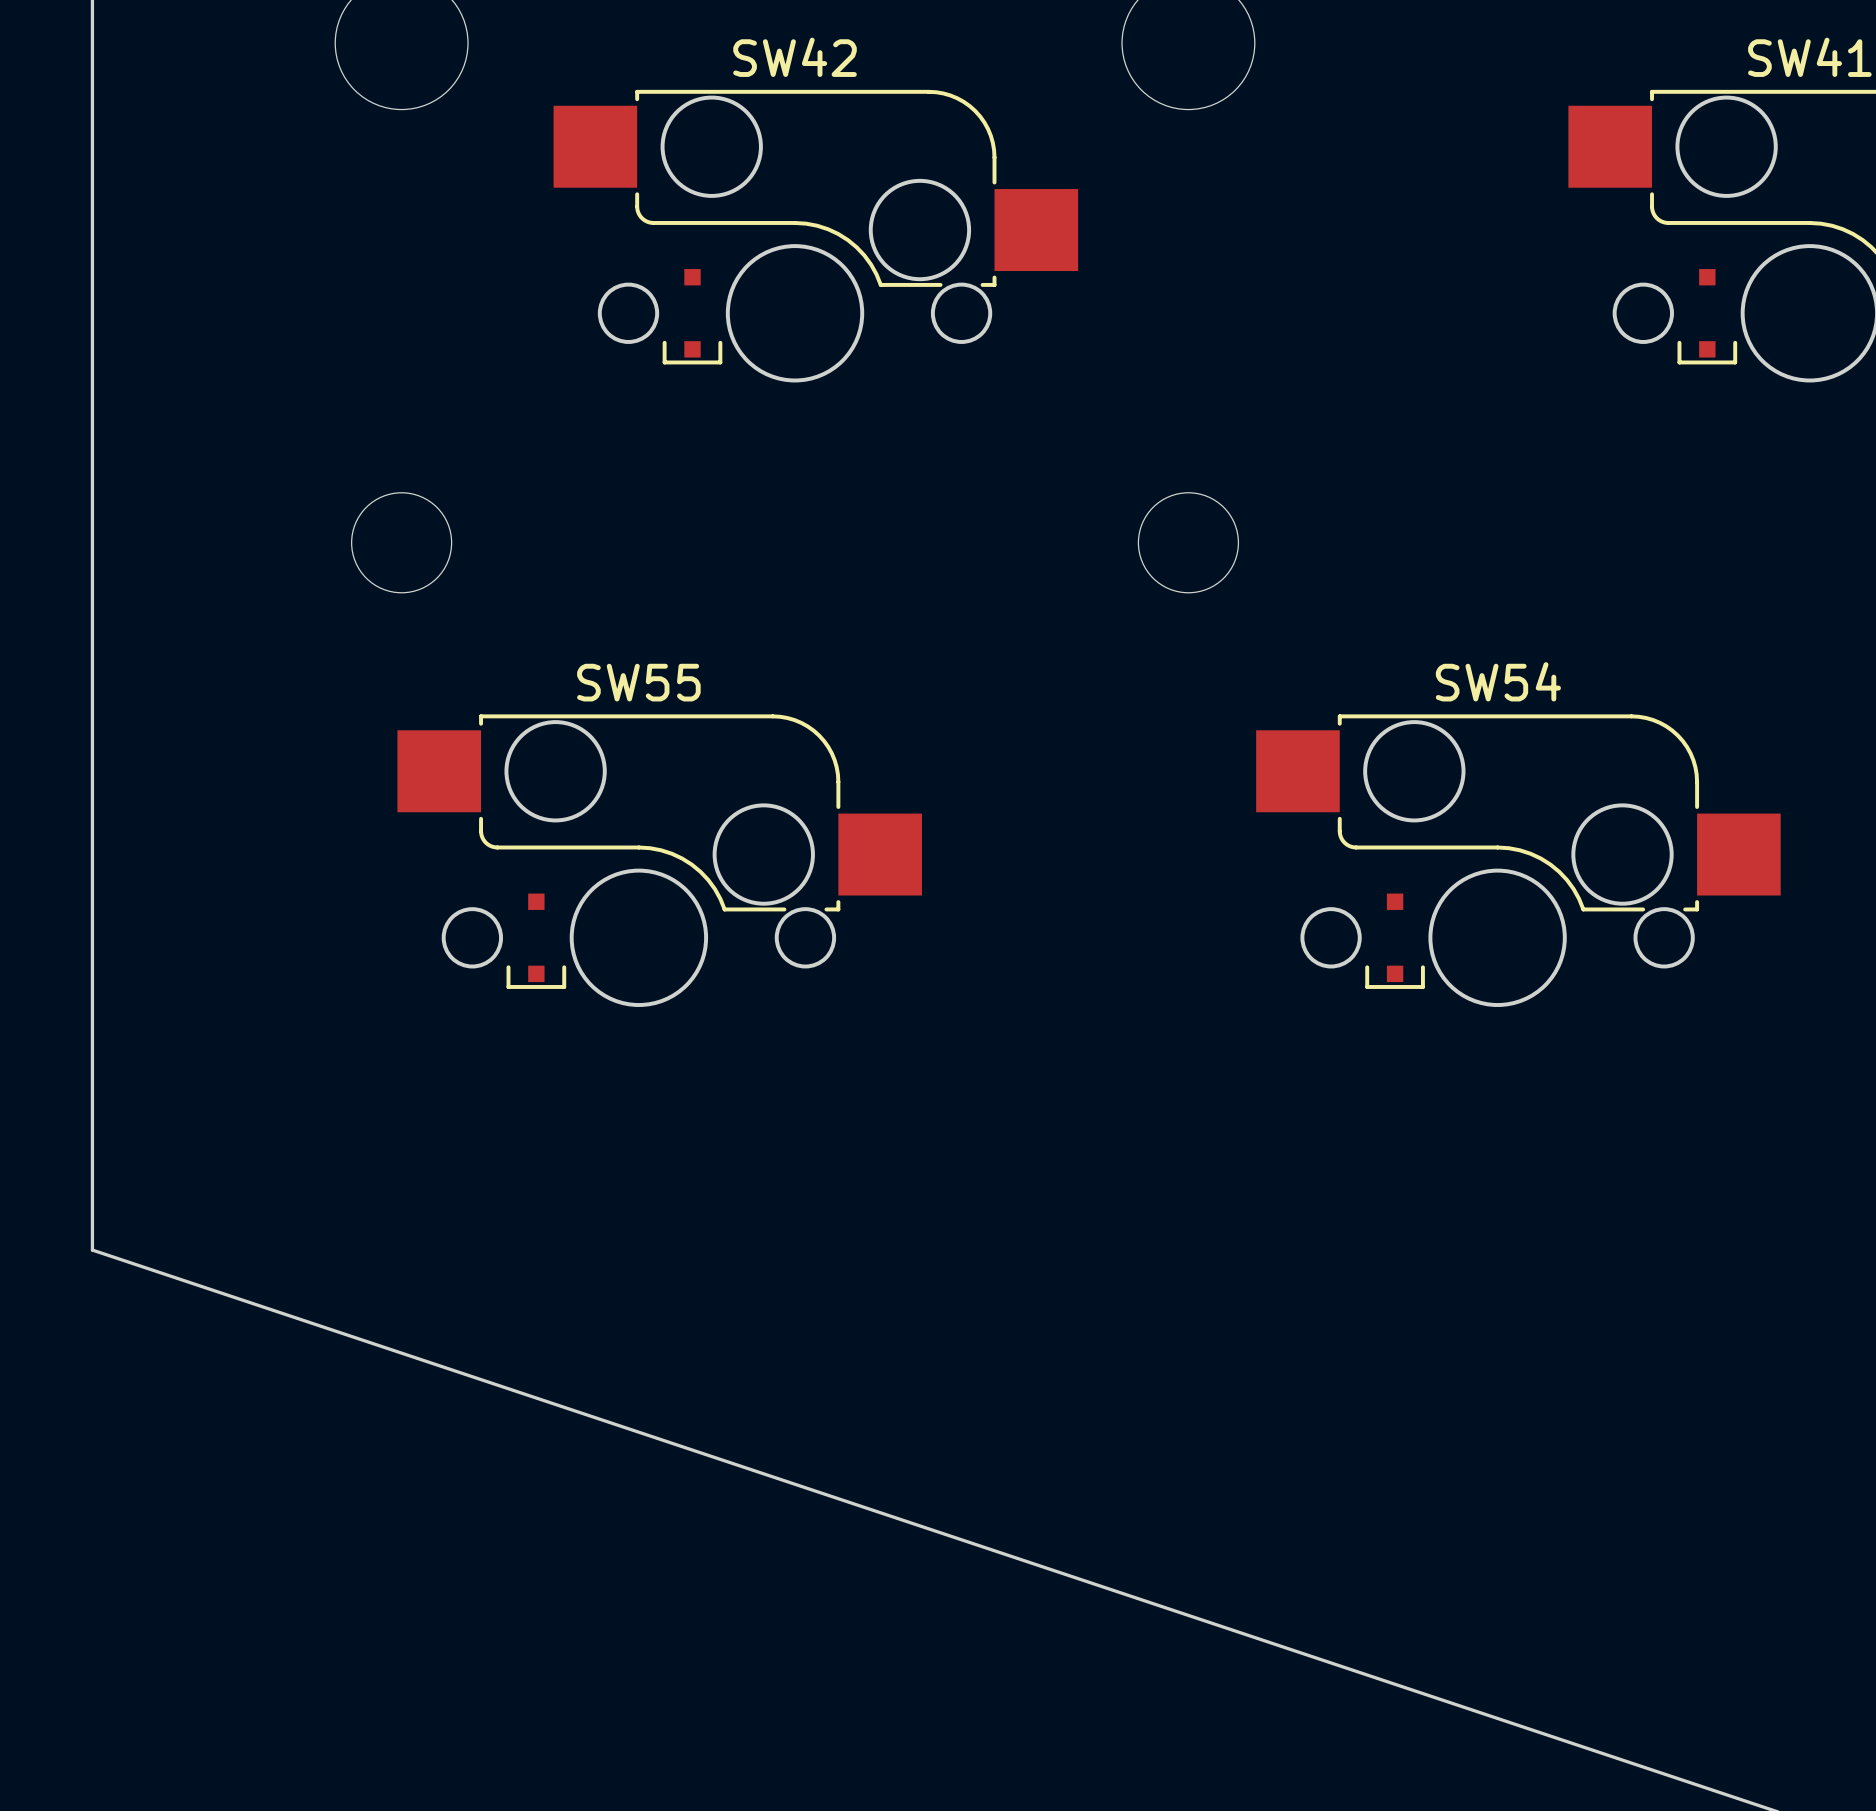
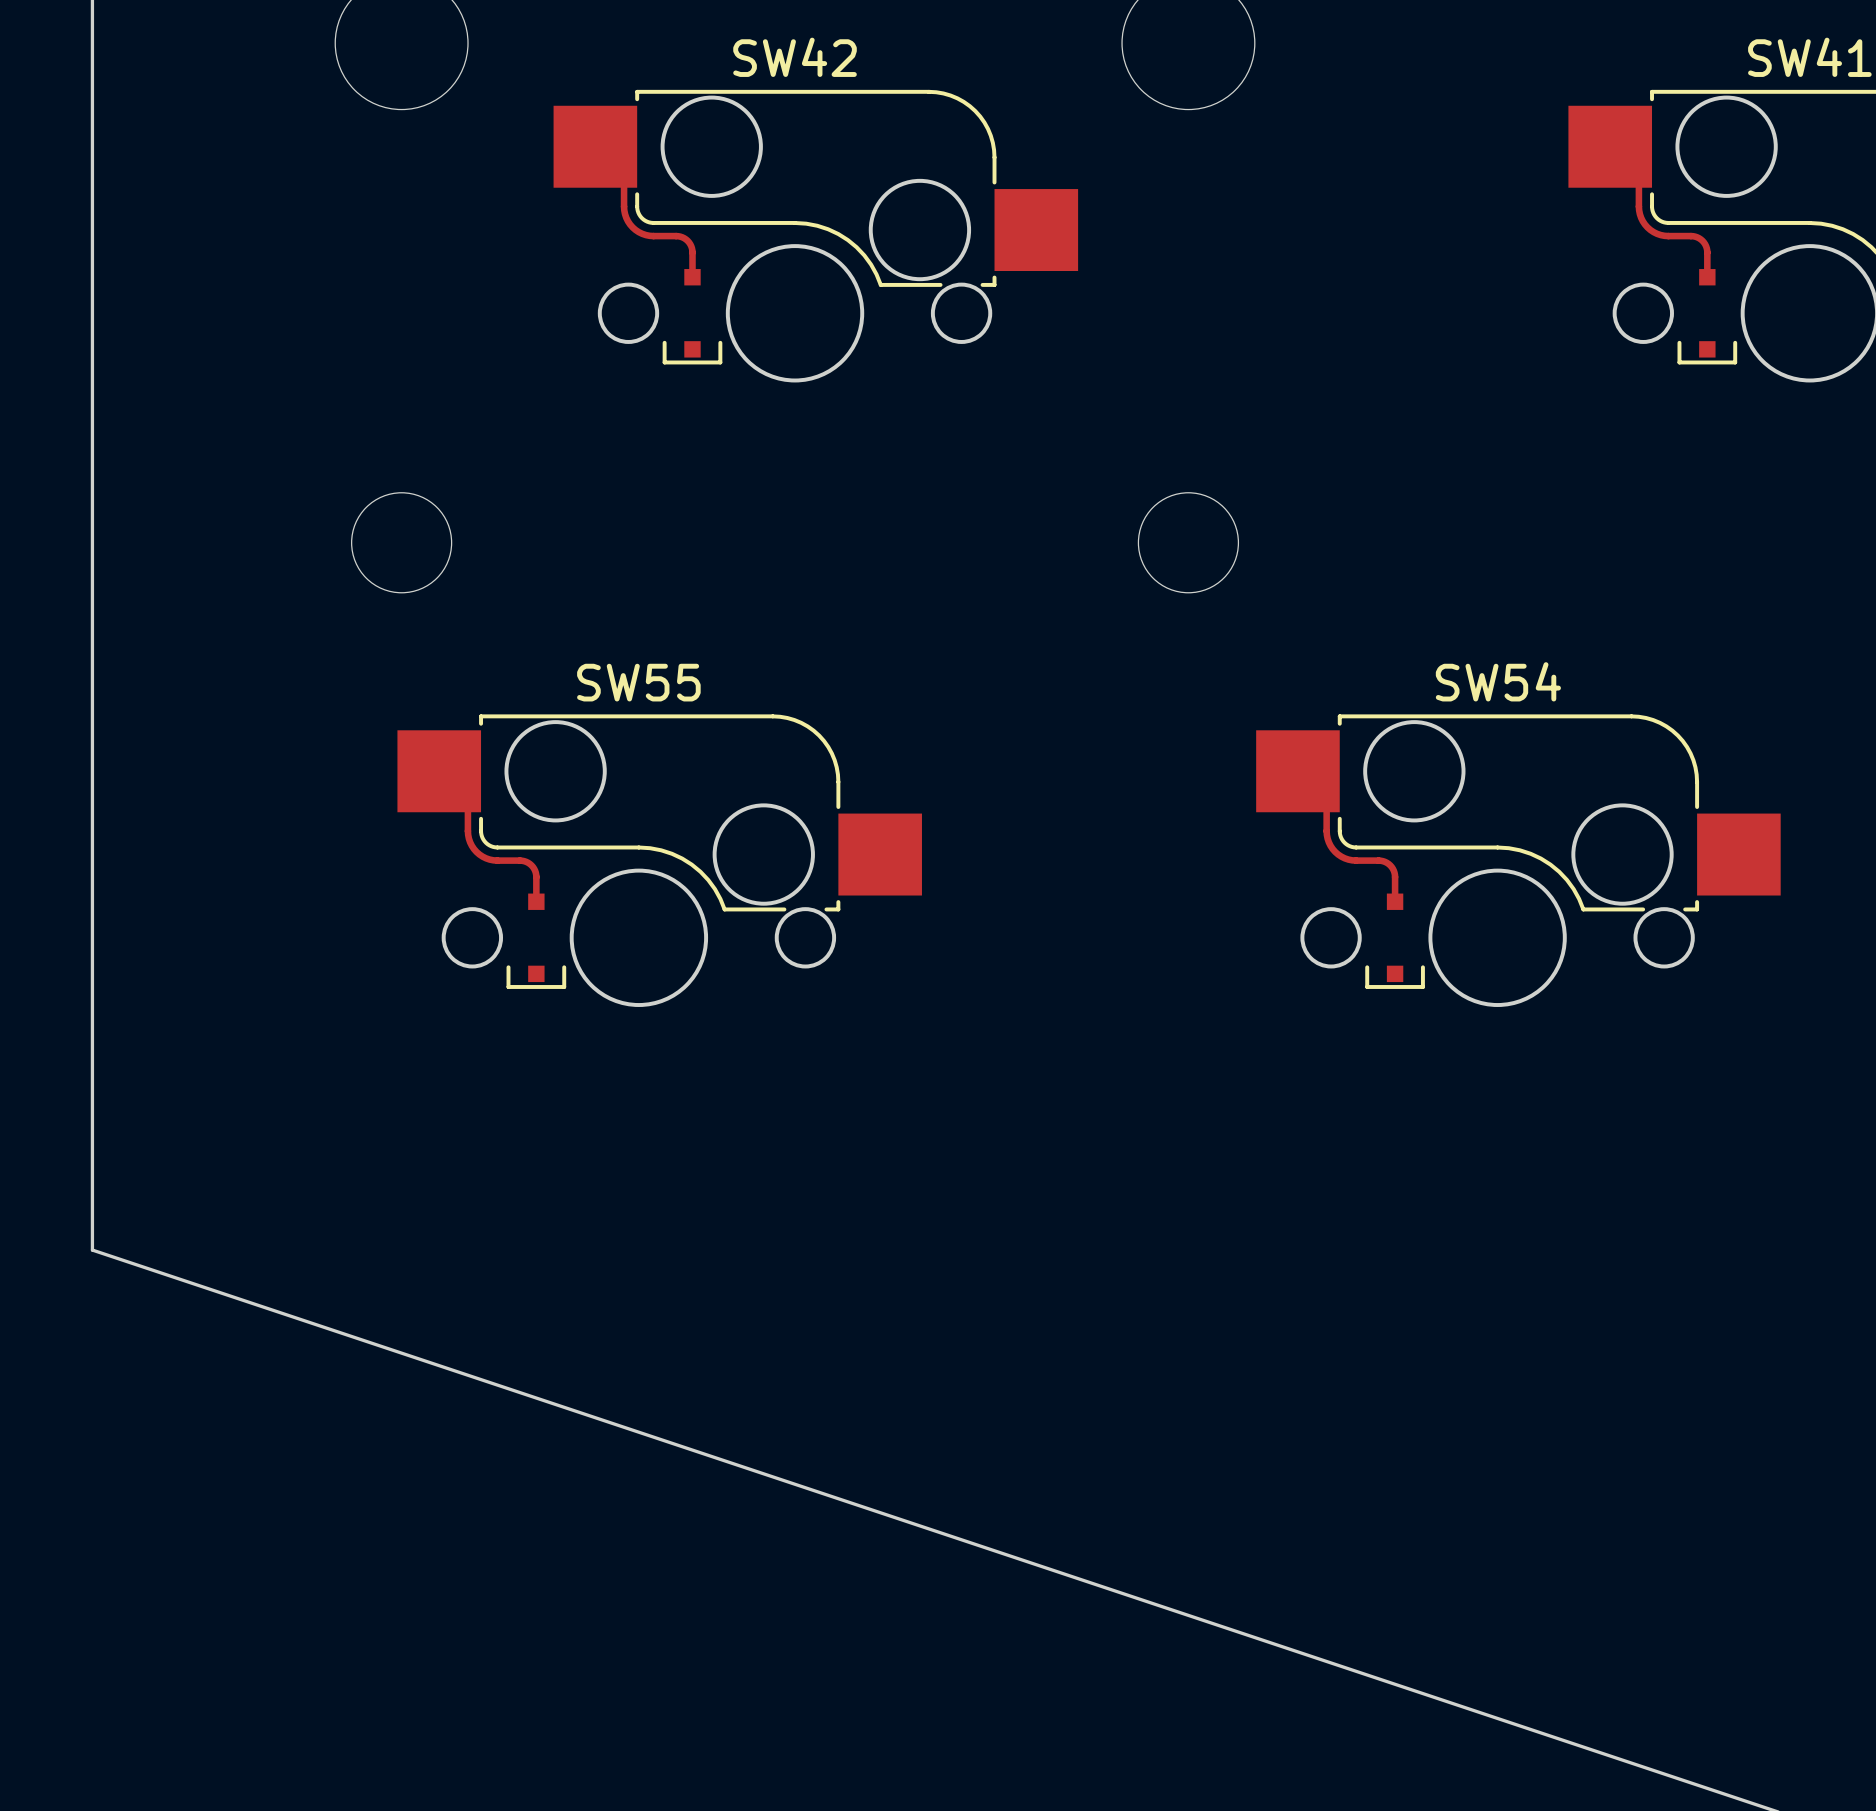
track: none -> (624, 146) (624, 206) (628, 221) (635, 229) (645, 235) (678, 236) (686, 239) (692, 250) (692, 277)
track: none -> (1638, 146) (1638, 206) (1642, 221) (1650, 229) (1660, 235) (1693, 236) (1700, 239) (1707, 250) (1707, 277)
track: none -> (467, 771) (467, 831) (471, 845) (479, 854) (489, 859) (522, 860) (529, 863) (536, 874) (536, 901)
track: none -> (1326, 771) (1326, 831) (1330, 845) (1338, 854) (1348, 859) (1380, 860) (1388, 863) (1394, 874) (1395, 901)

